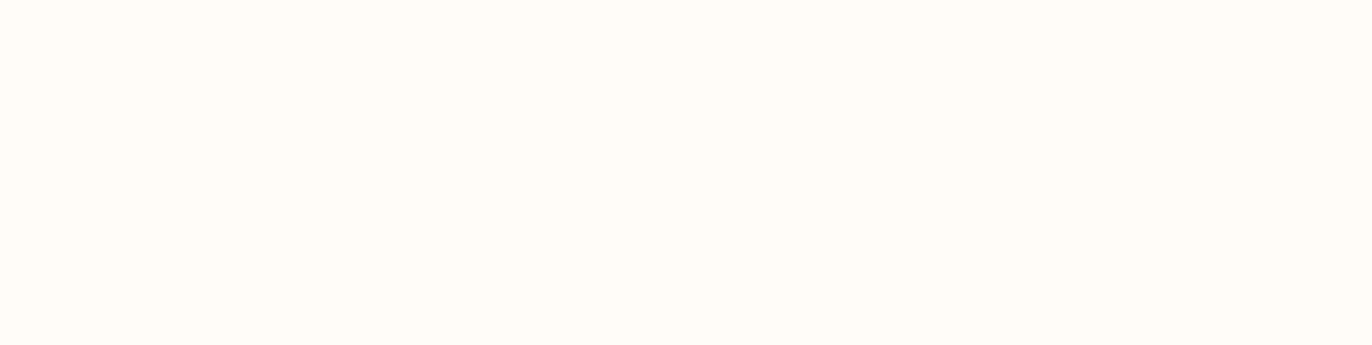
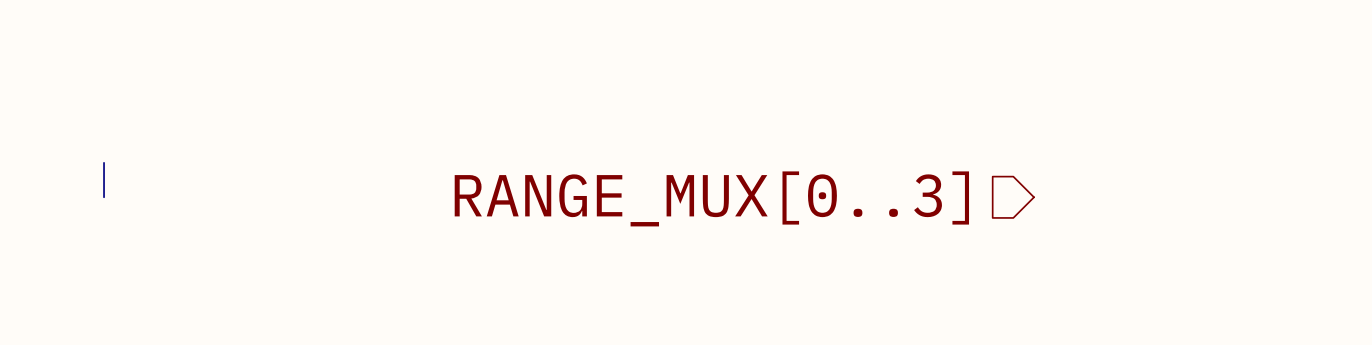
bus: none -> (104, 162) (104, 197)
hierarchical label: none -> RANGE_MUX[0..3] (711, 198)

